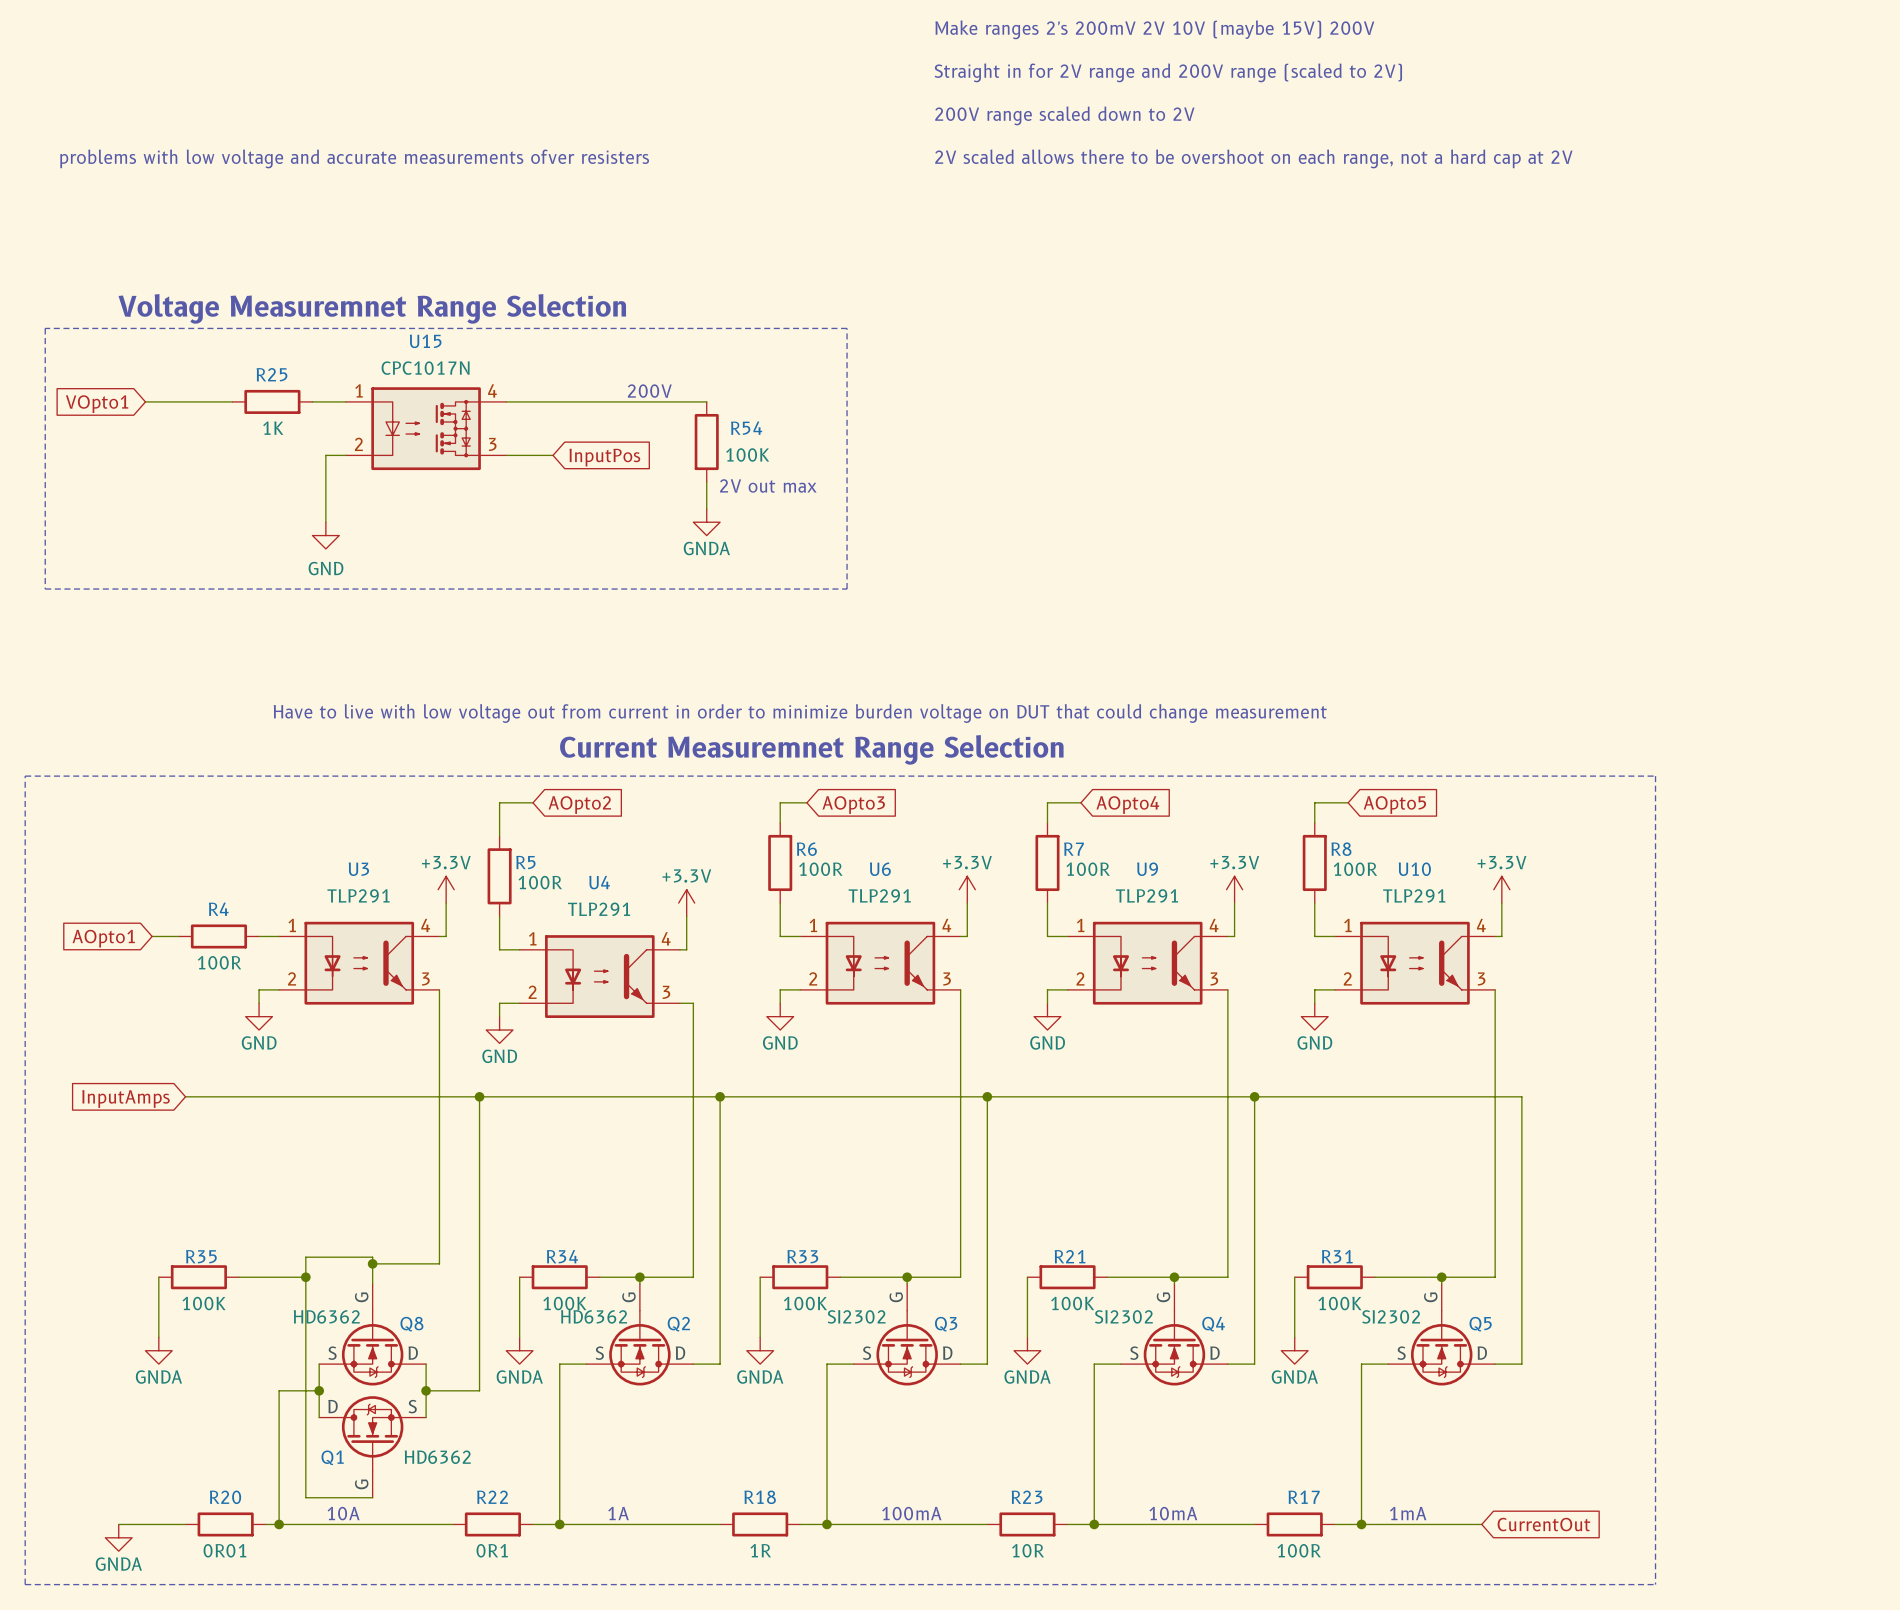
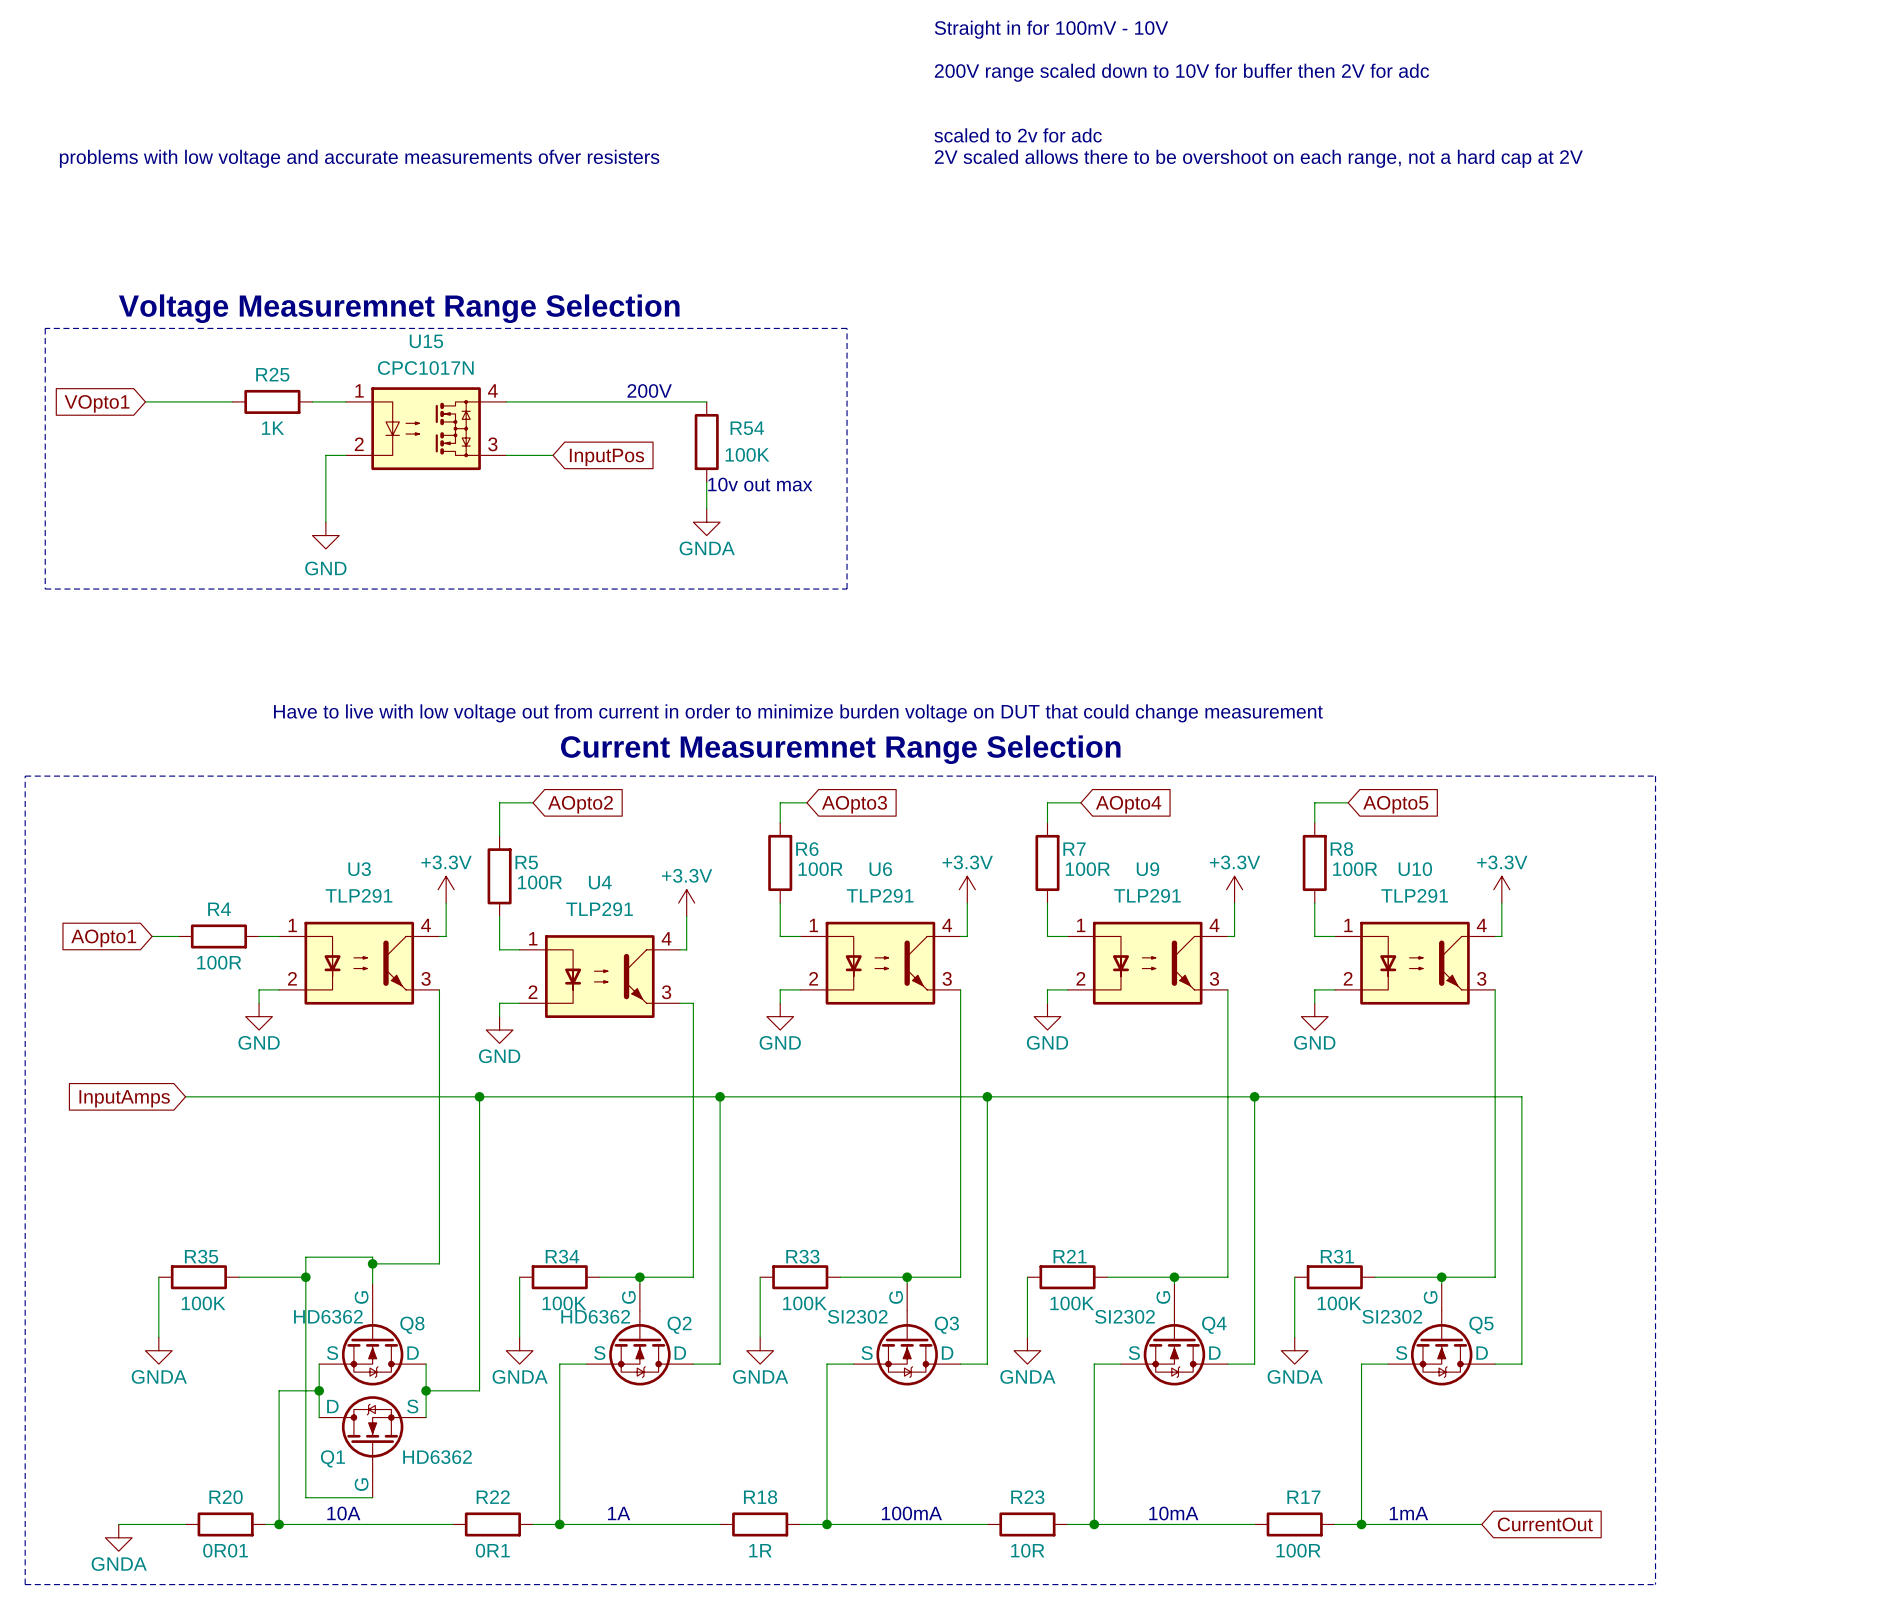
text: Make ranges 2's 200mV 2V 10V (maybe 15V) 200V (1154, 29) -> Straight in for 100mV - 10V (1051, 29)
text: Straight in for 2V range and 200V range (scaled to 2V) (1168, 72) -> 200V range scaled down to 10V for buffer then 2V for adc (1181, 72)
text: 200V range scaled down to 2V (1064, 115) -> none
text: none -> scaled to 2v for adc (1018, 135)
text: 2V out max (768, 485) -> 10v out max (760, 484)

